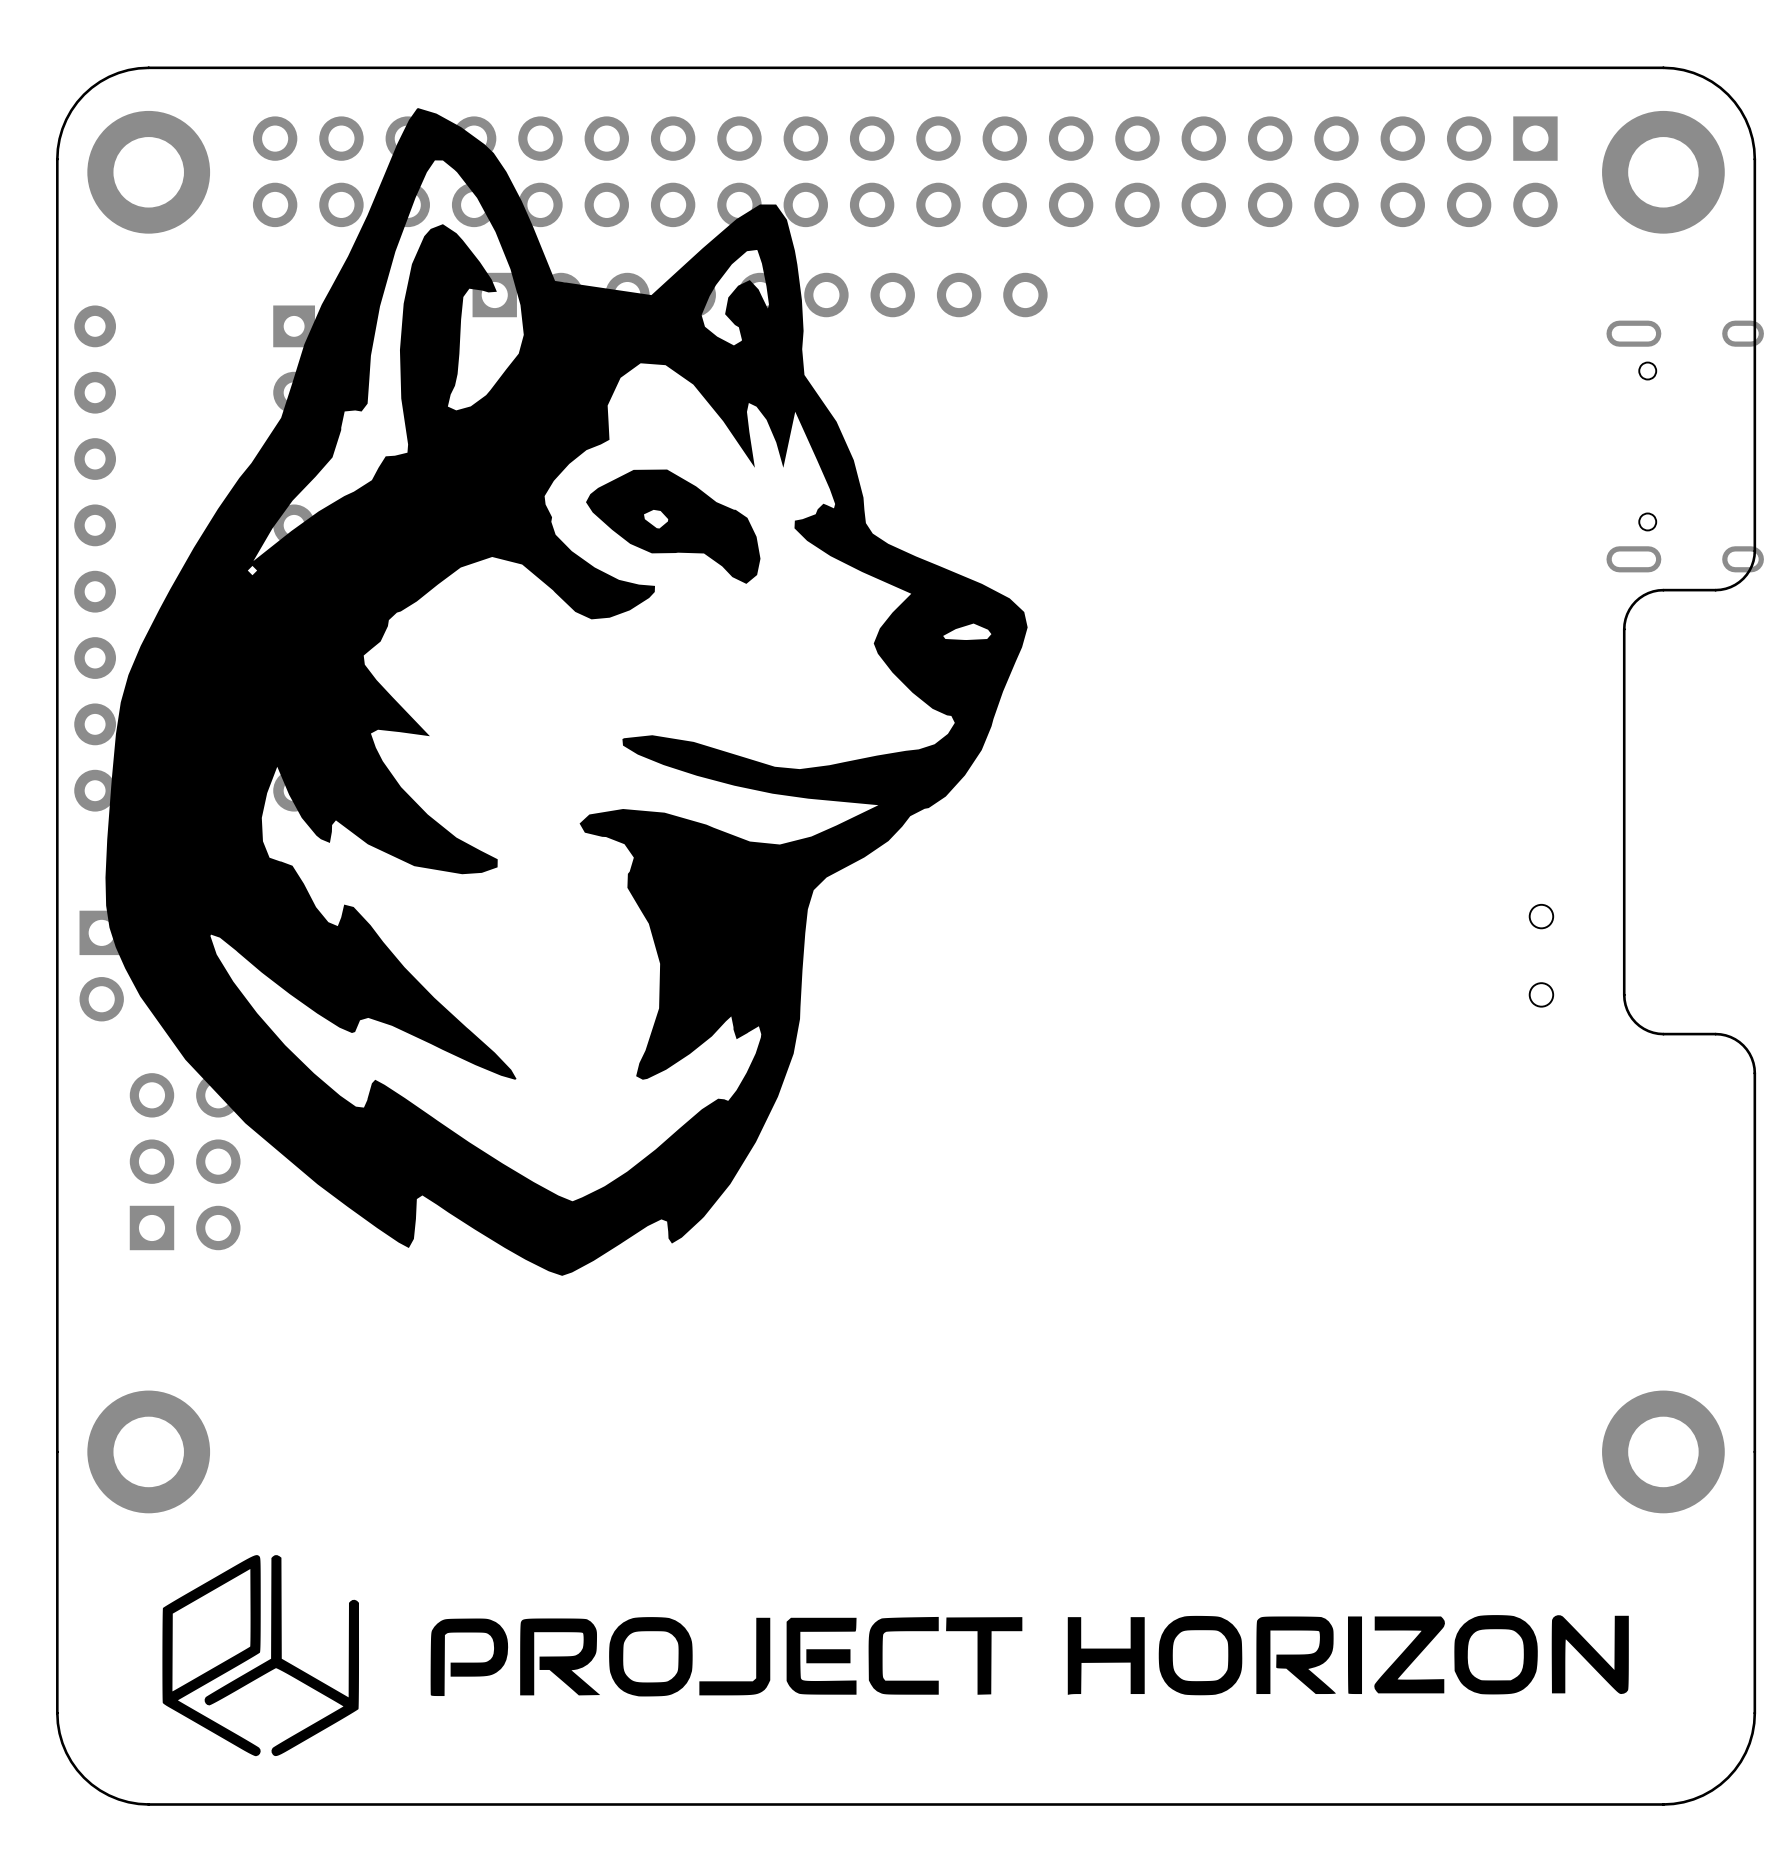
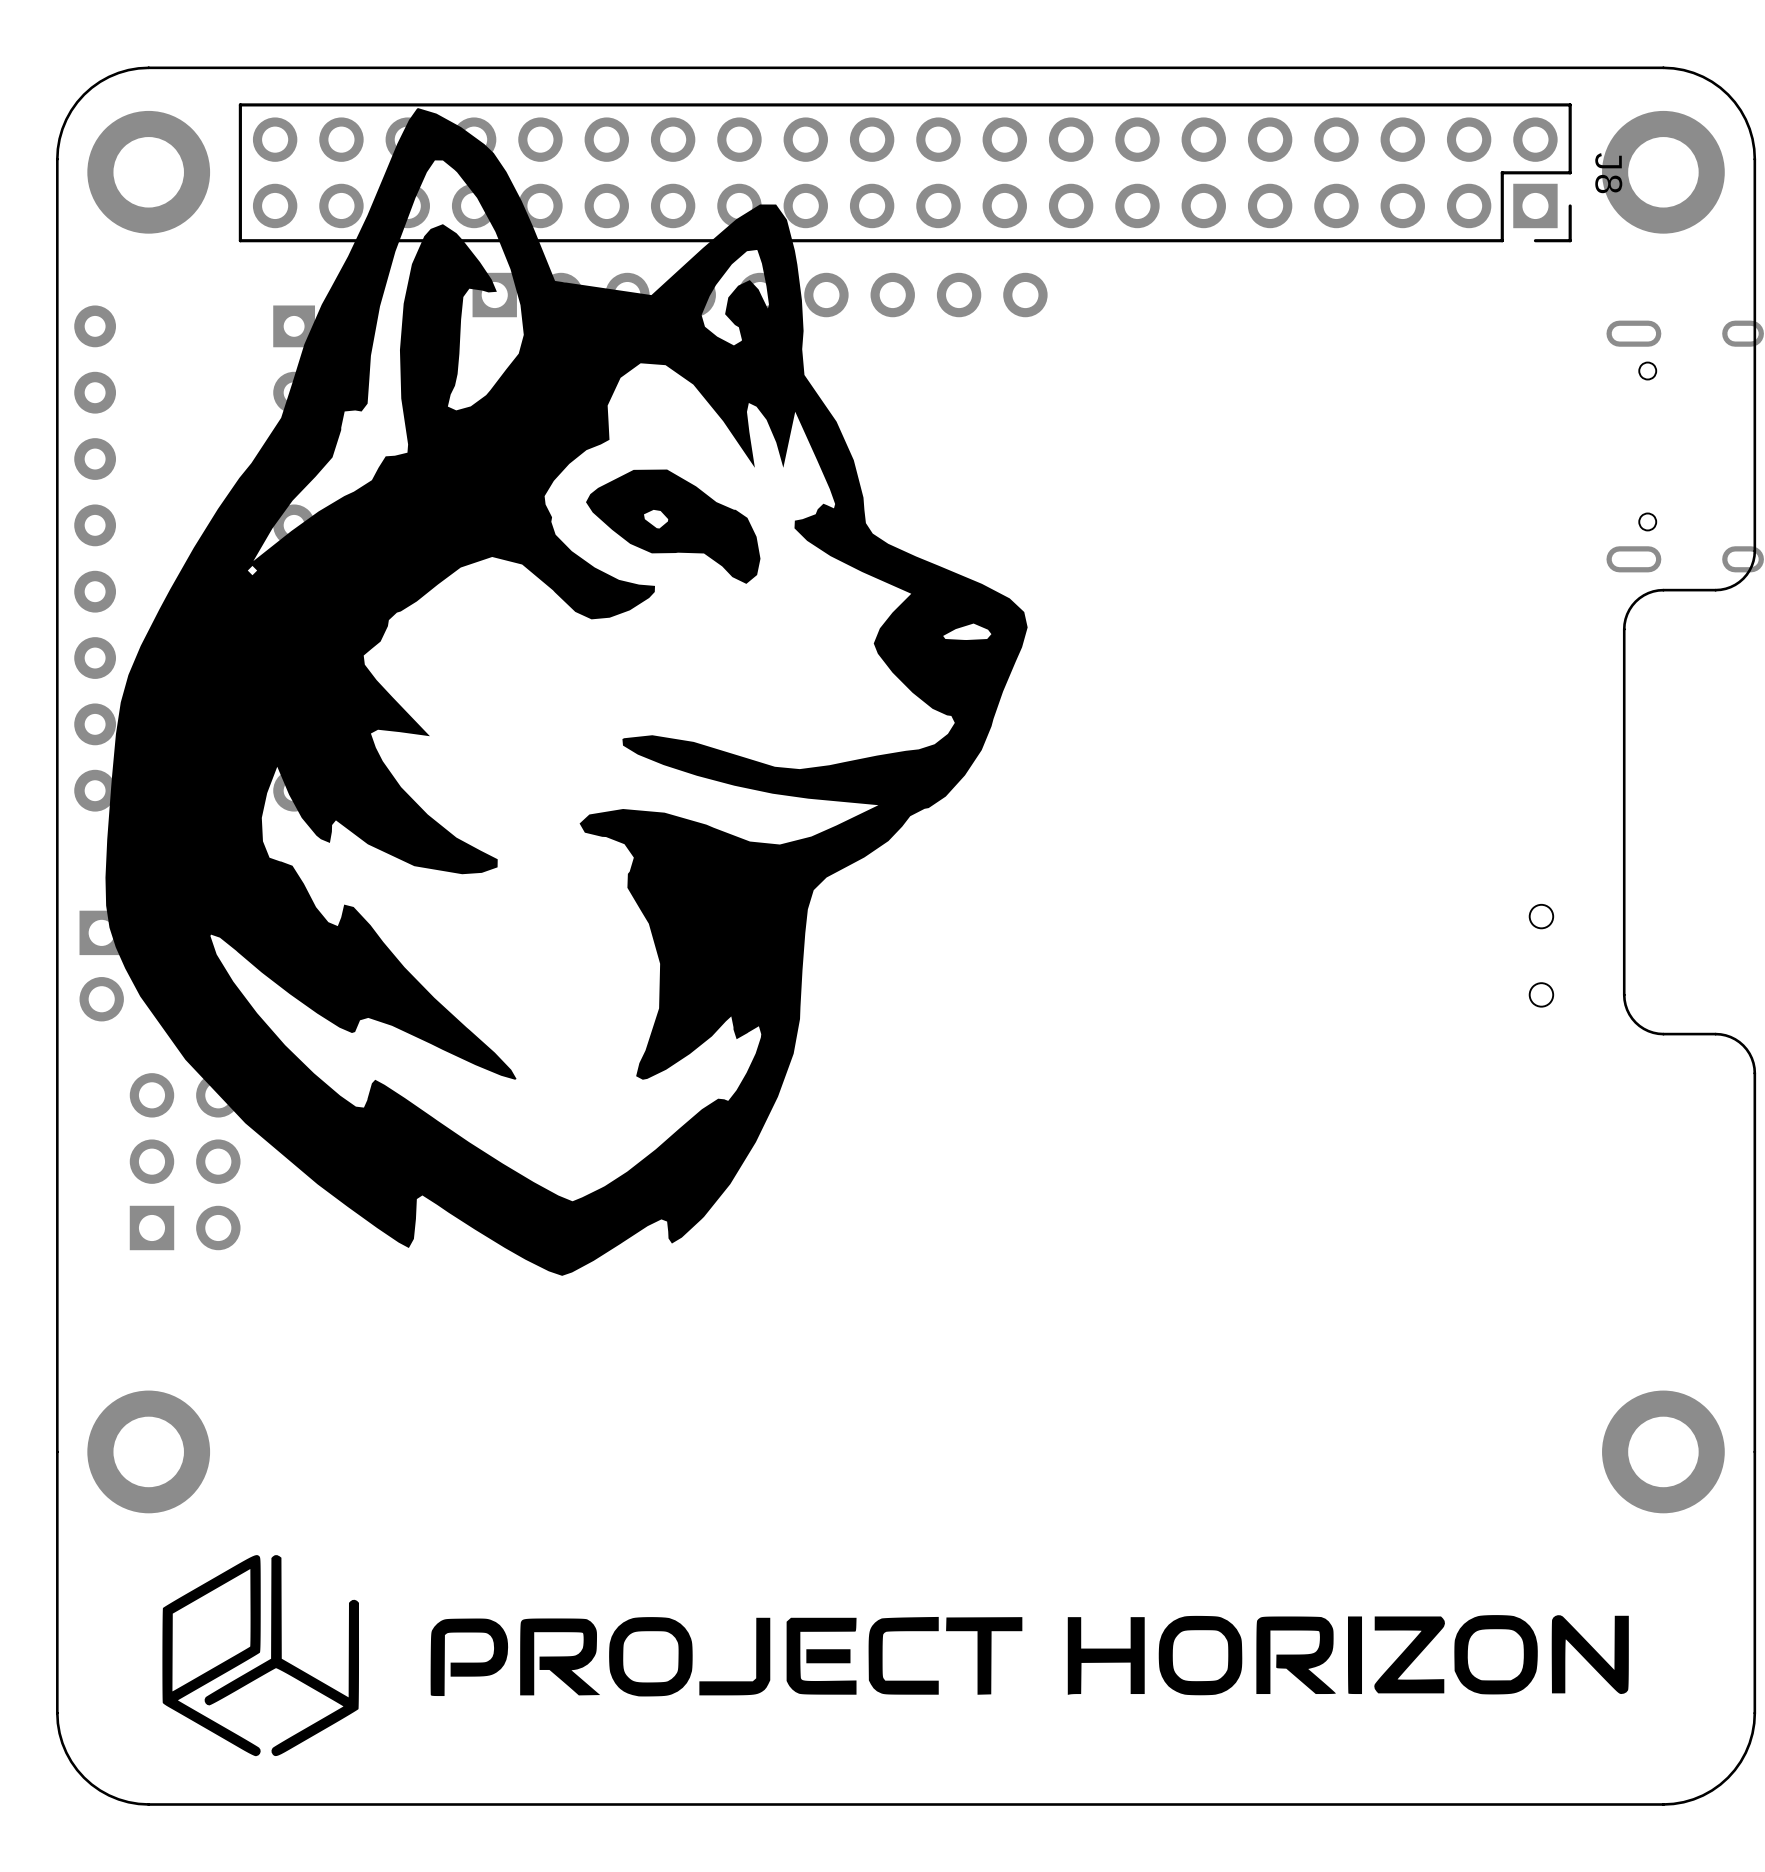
J8 side: top (905, 171) -> bottom (905, 172)

